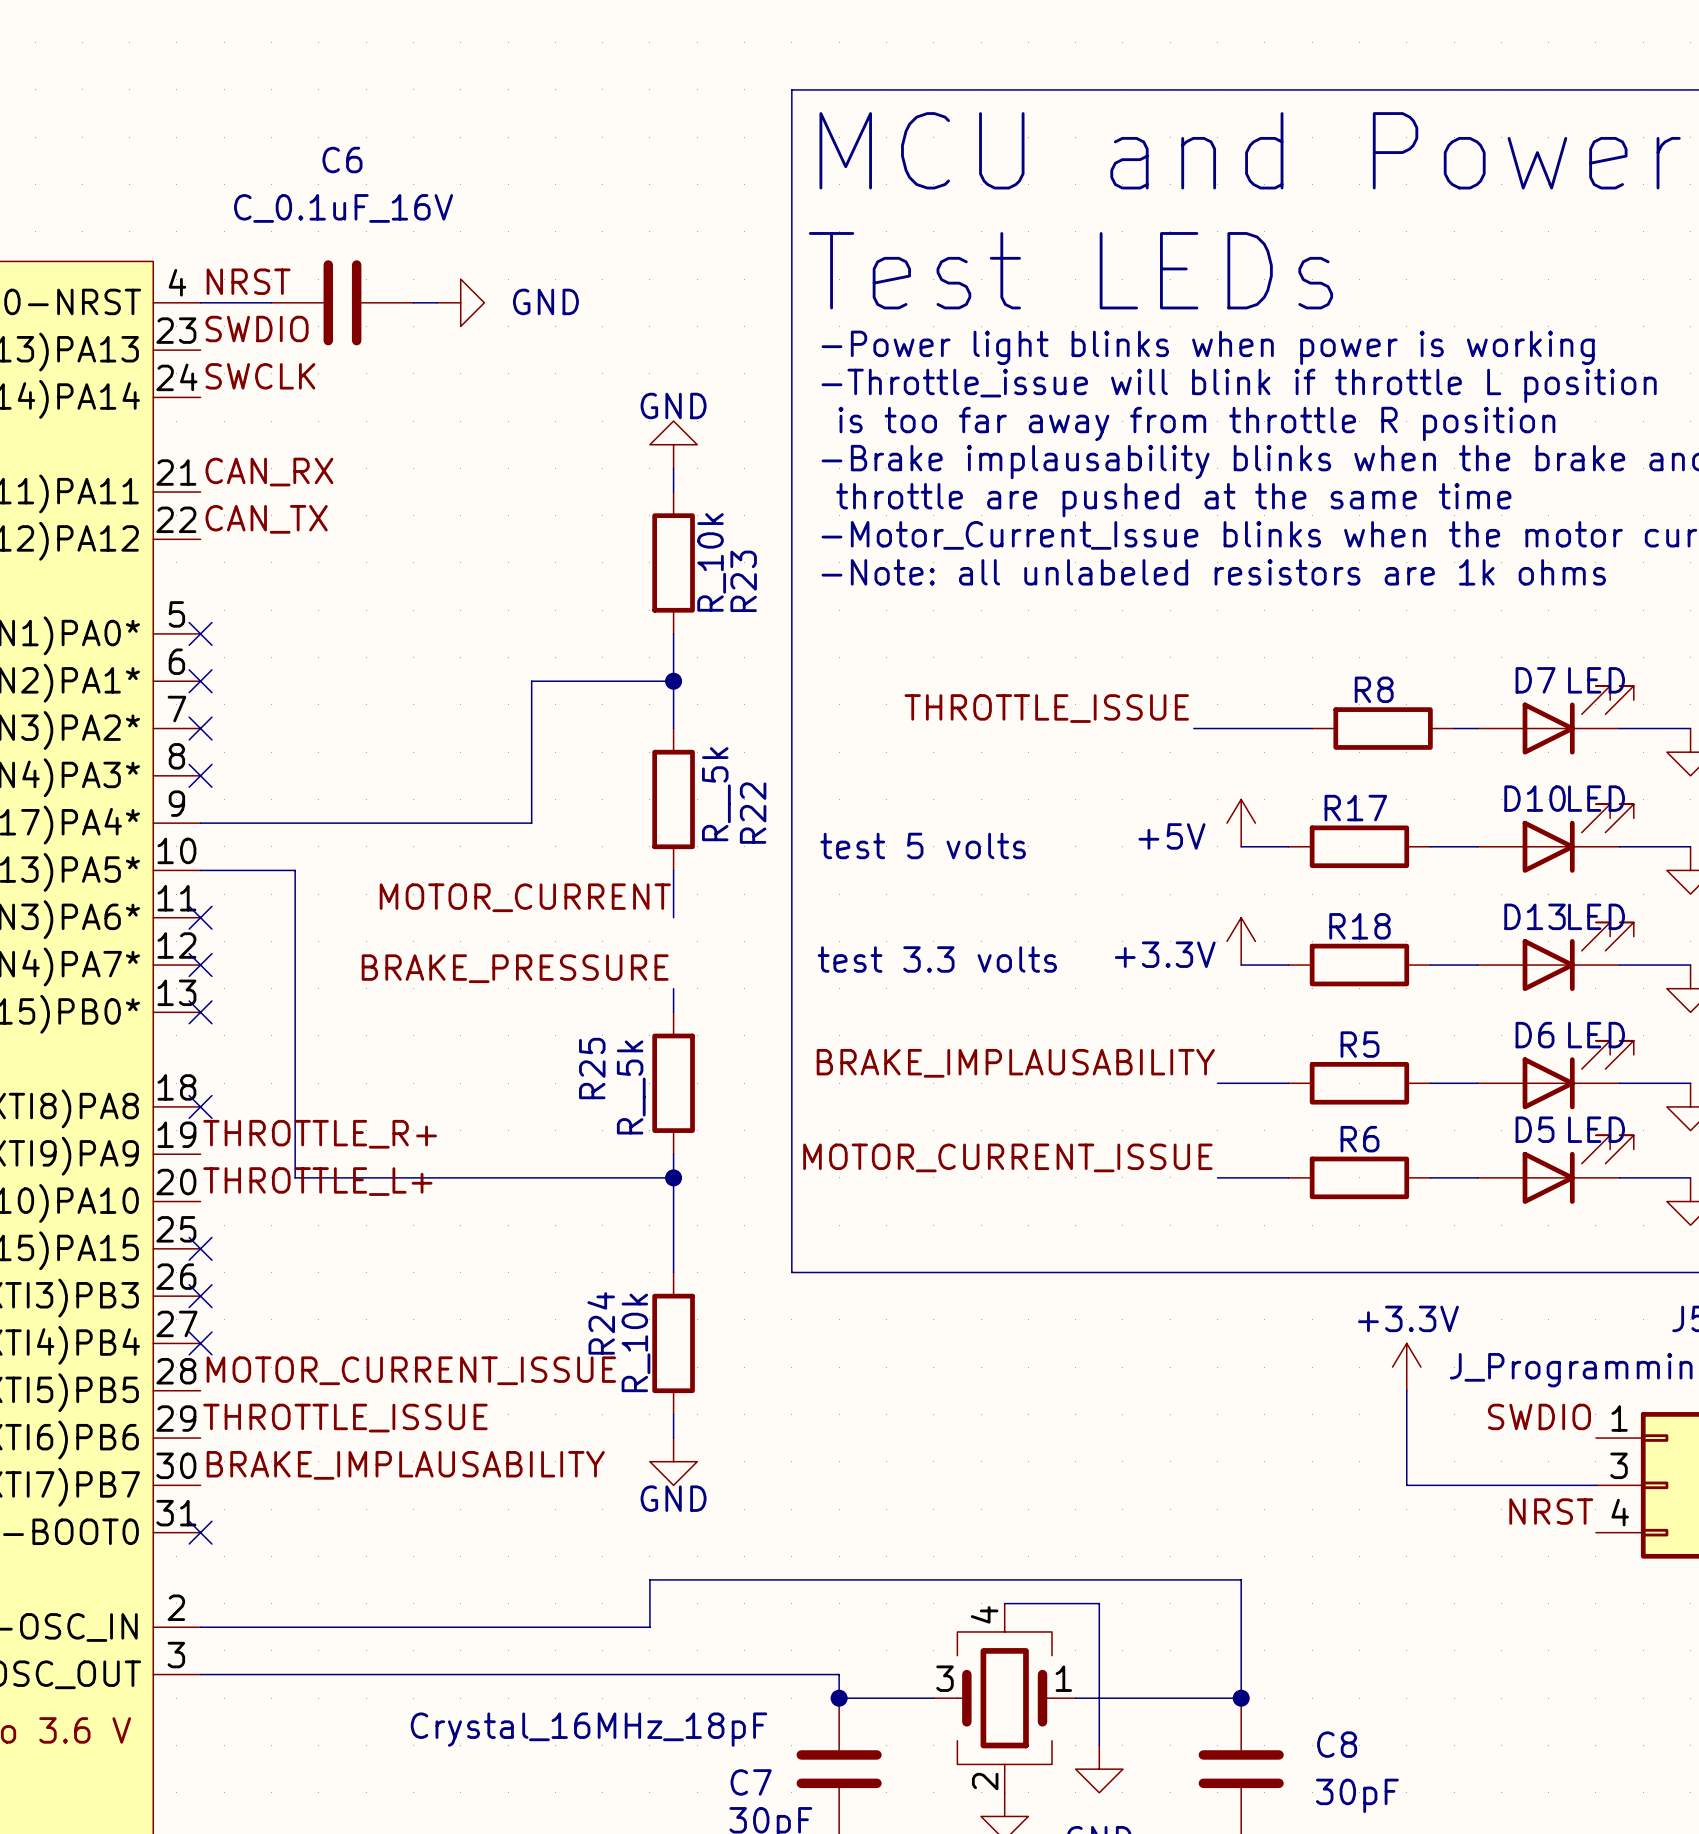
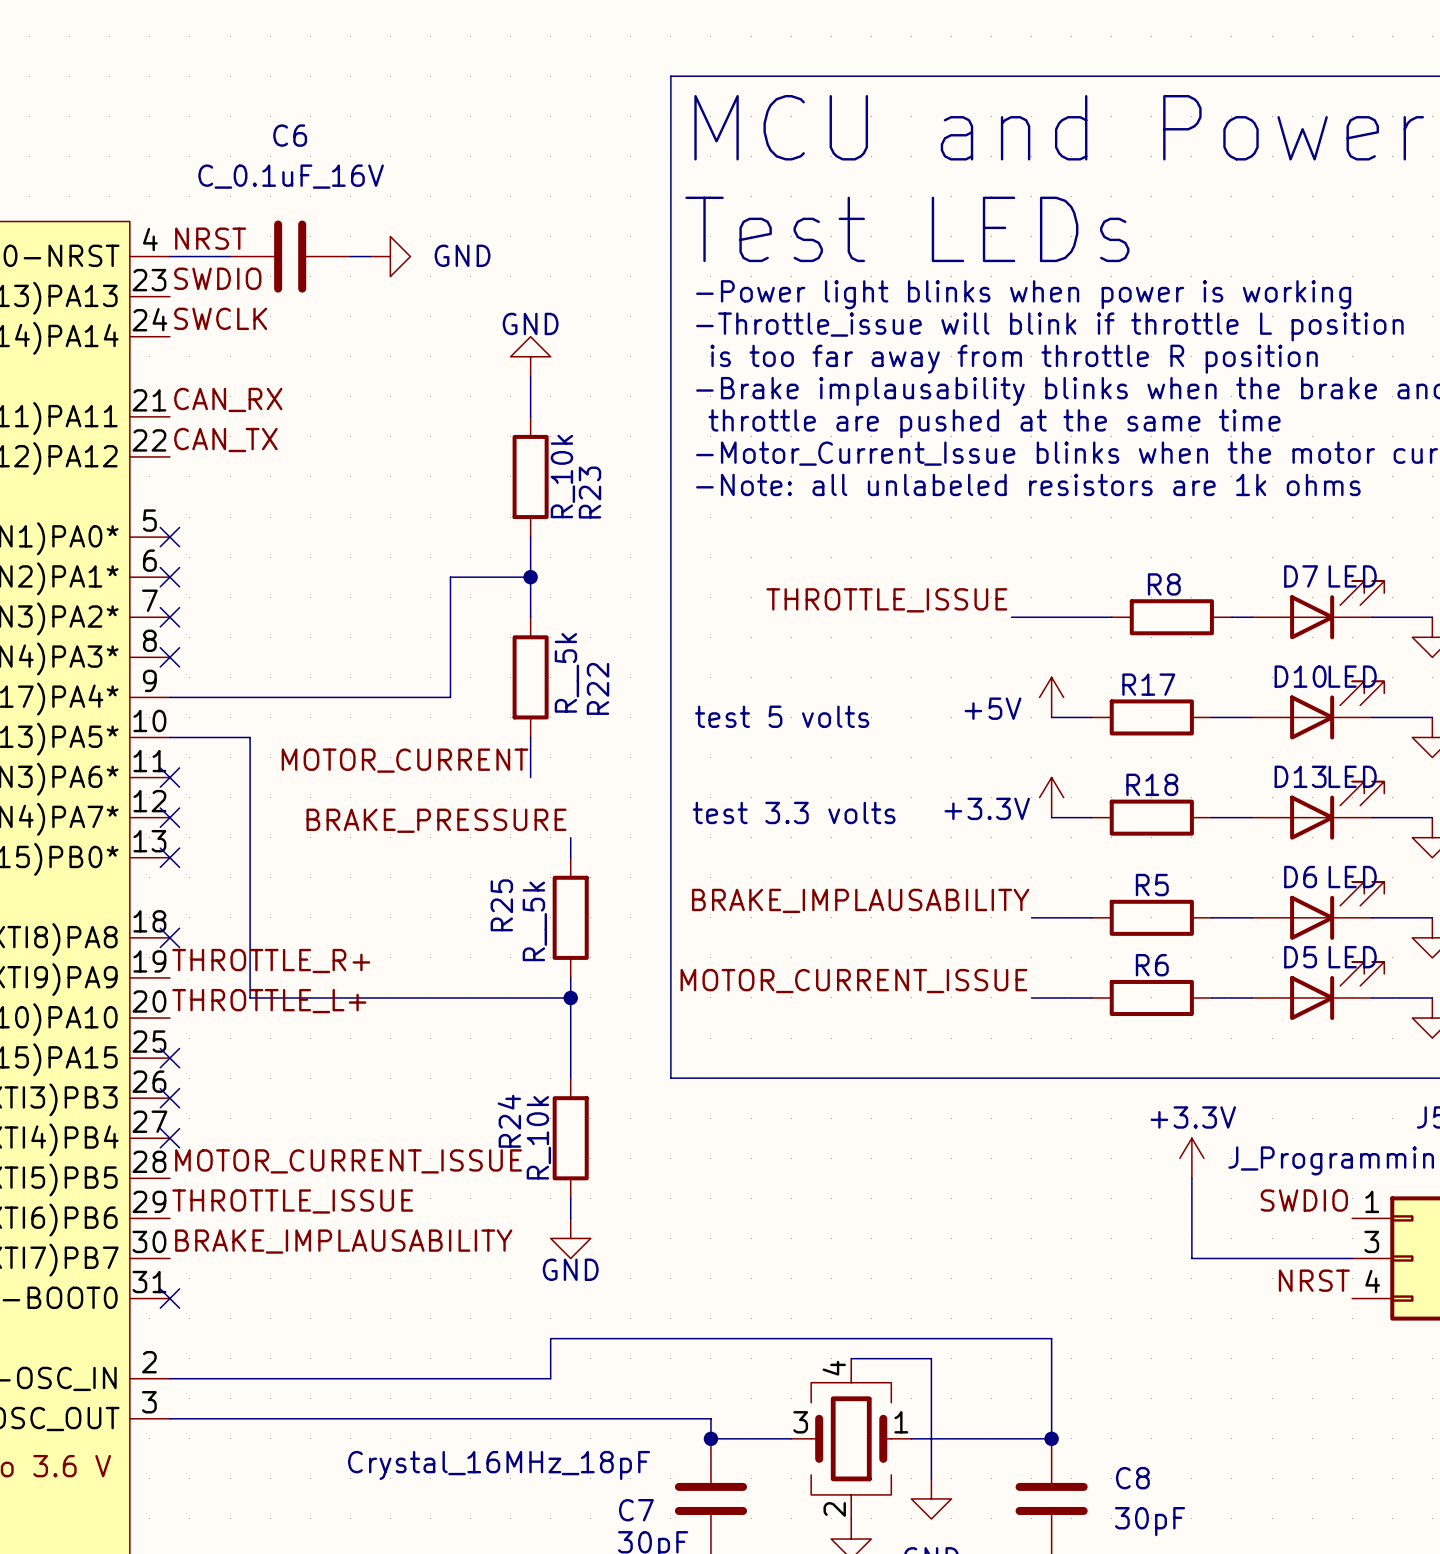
wire: none -> (530, 376) (530, 416)
power symbol position: GND (673, 444) -> GND (530, 356)
wire: (673, 468) (673, 492) -> none
R23 position: (673, 562) -> (530, 476)
wire: (673, 633) (673, 728) -> (530, 537) (530, 617)
wire: (626, 681) (673, 681) -> none
junction position: (673, 681) -> (530, 577)
R22 position: (673, 799) -> (530, 677)
wire: (673, 870) (673, 917) -> (530, 737) (530, 777)
label position: MOTOR_CURRENT (525, 897) -> MOTOR_CURRENT (404, 760)

